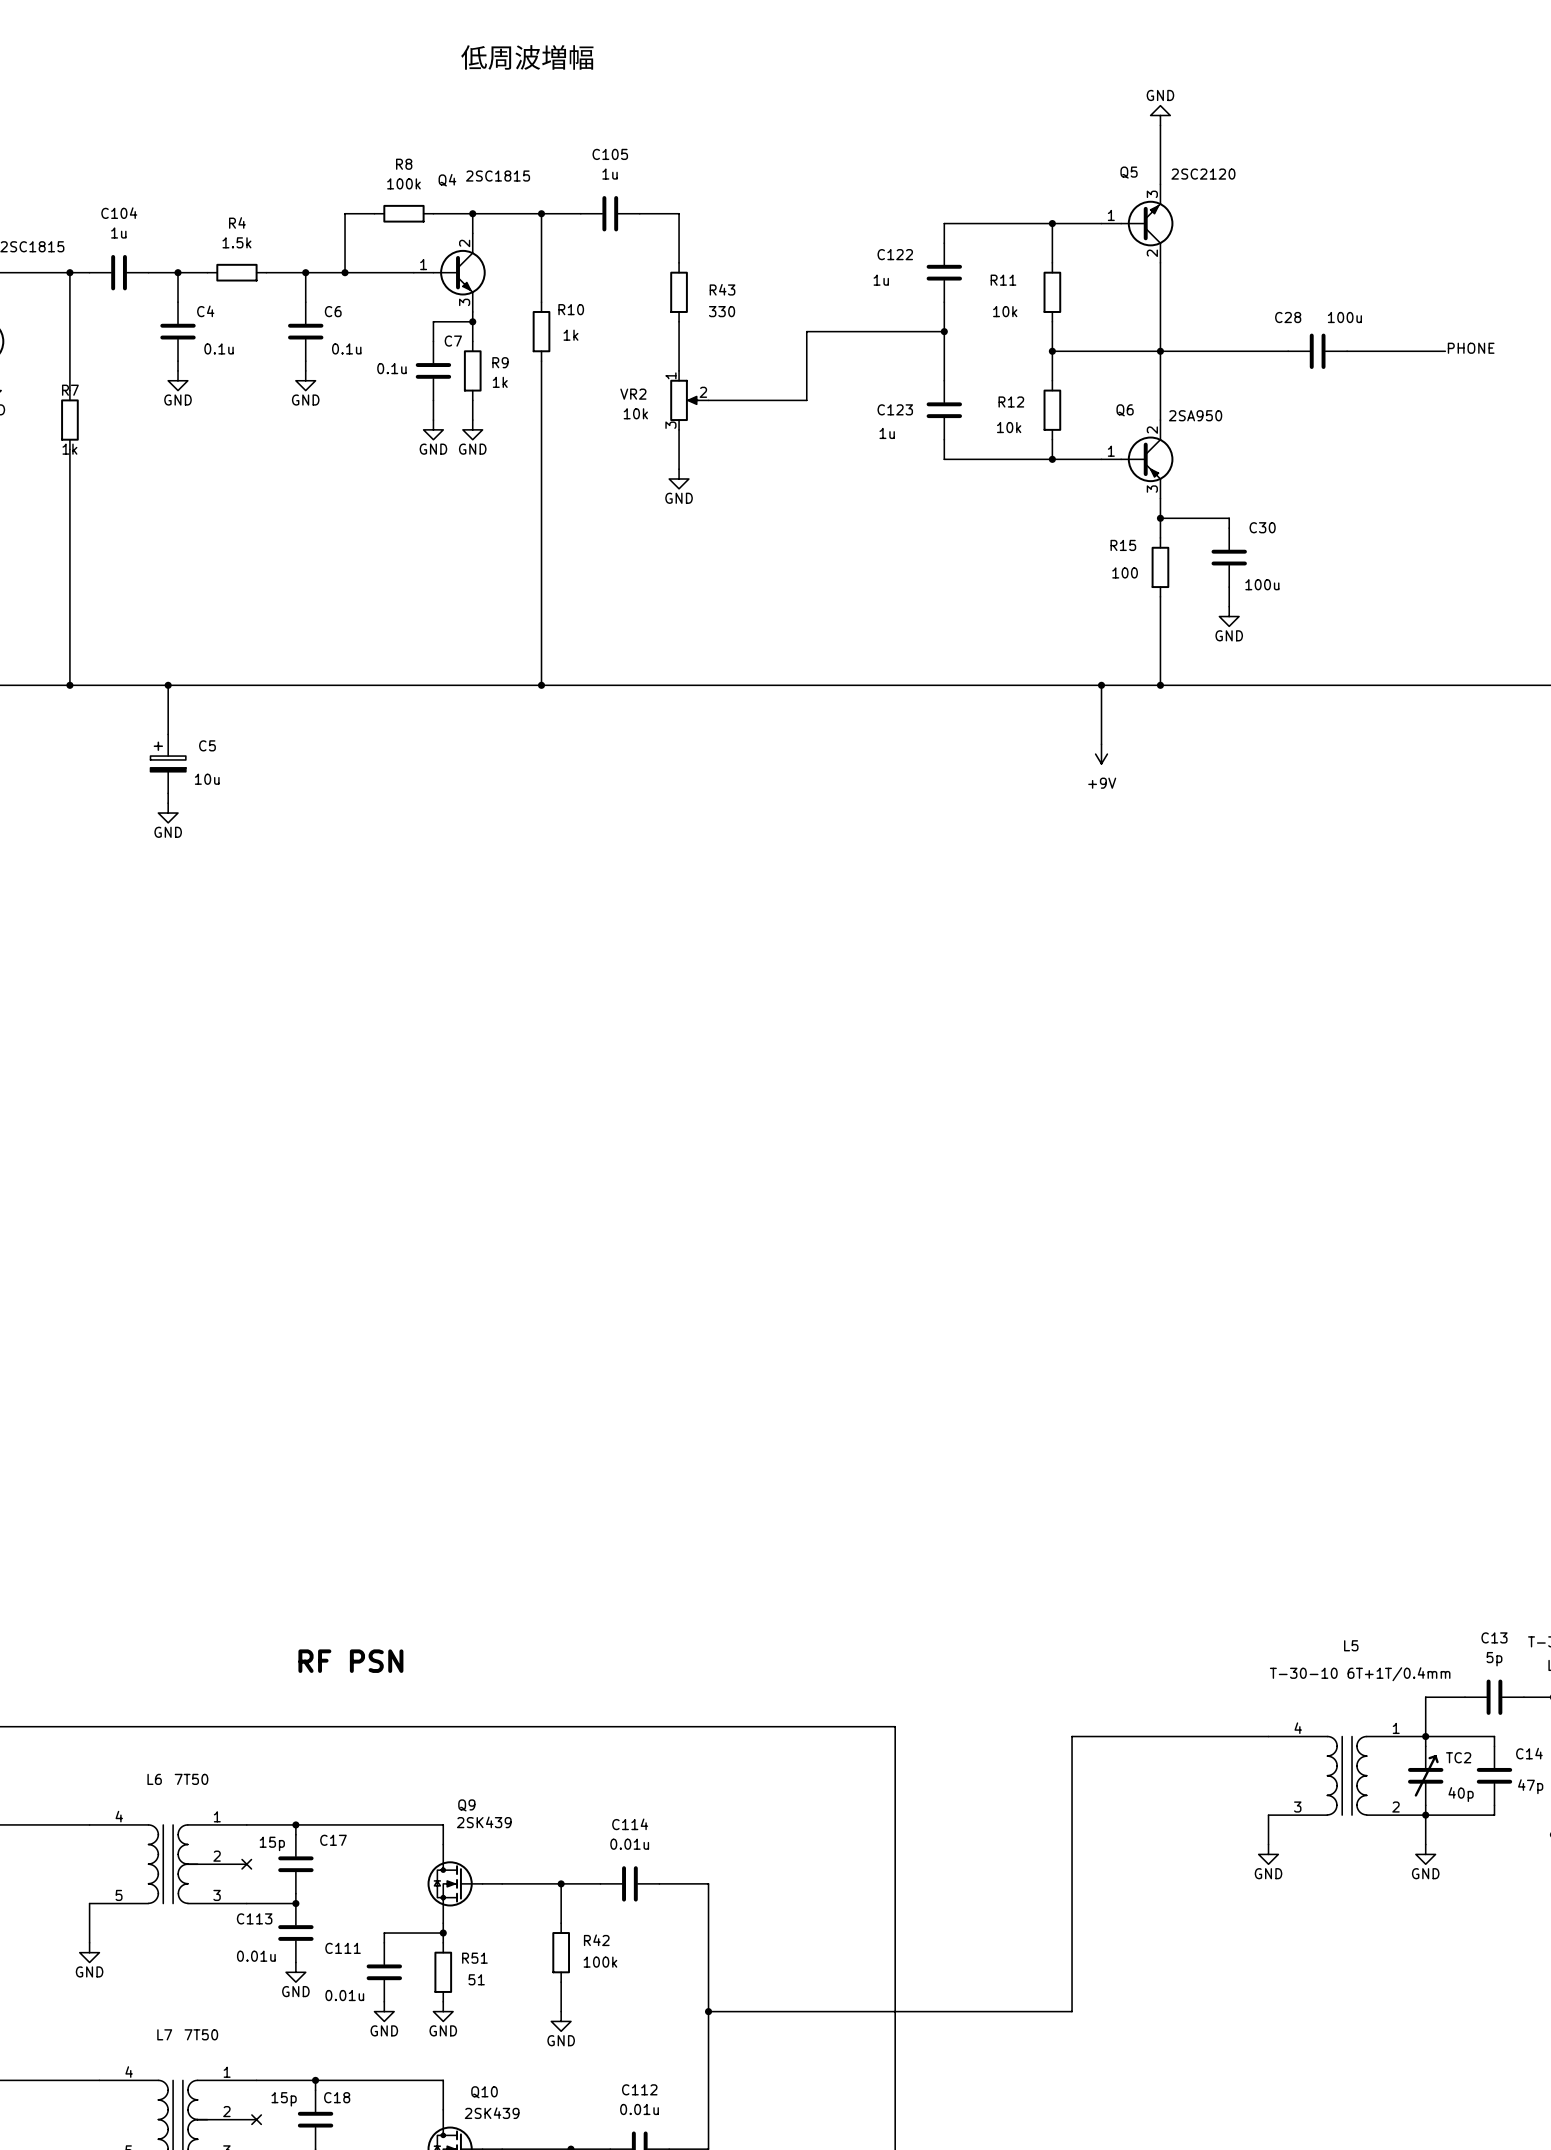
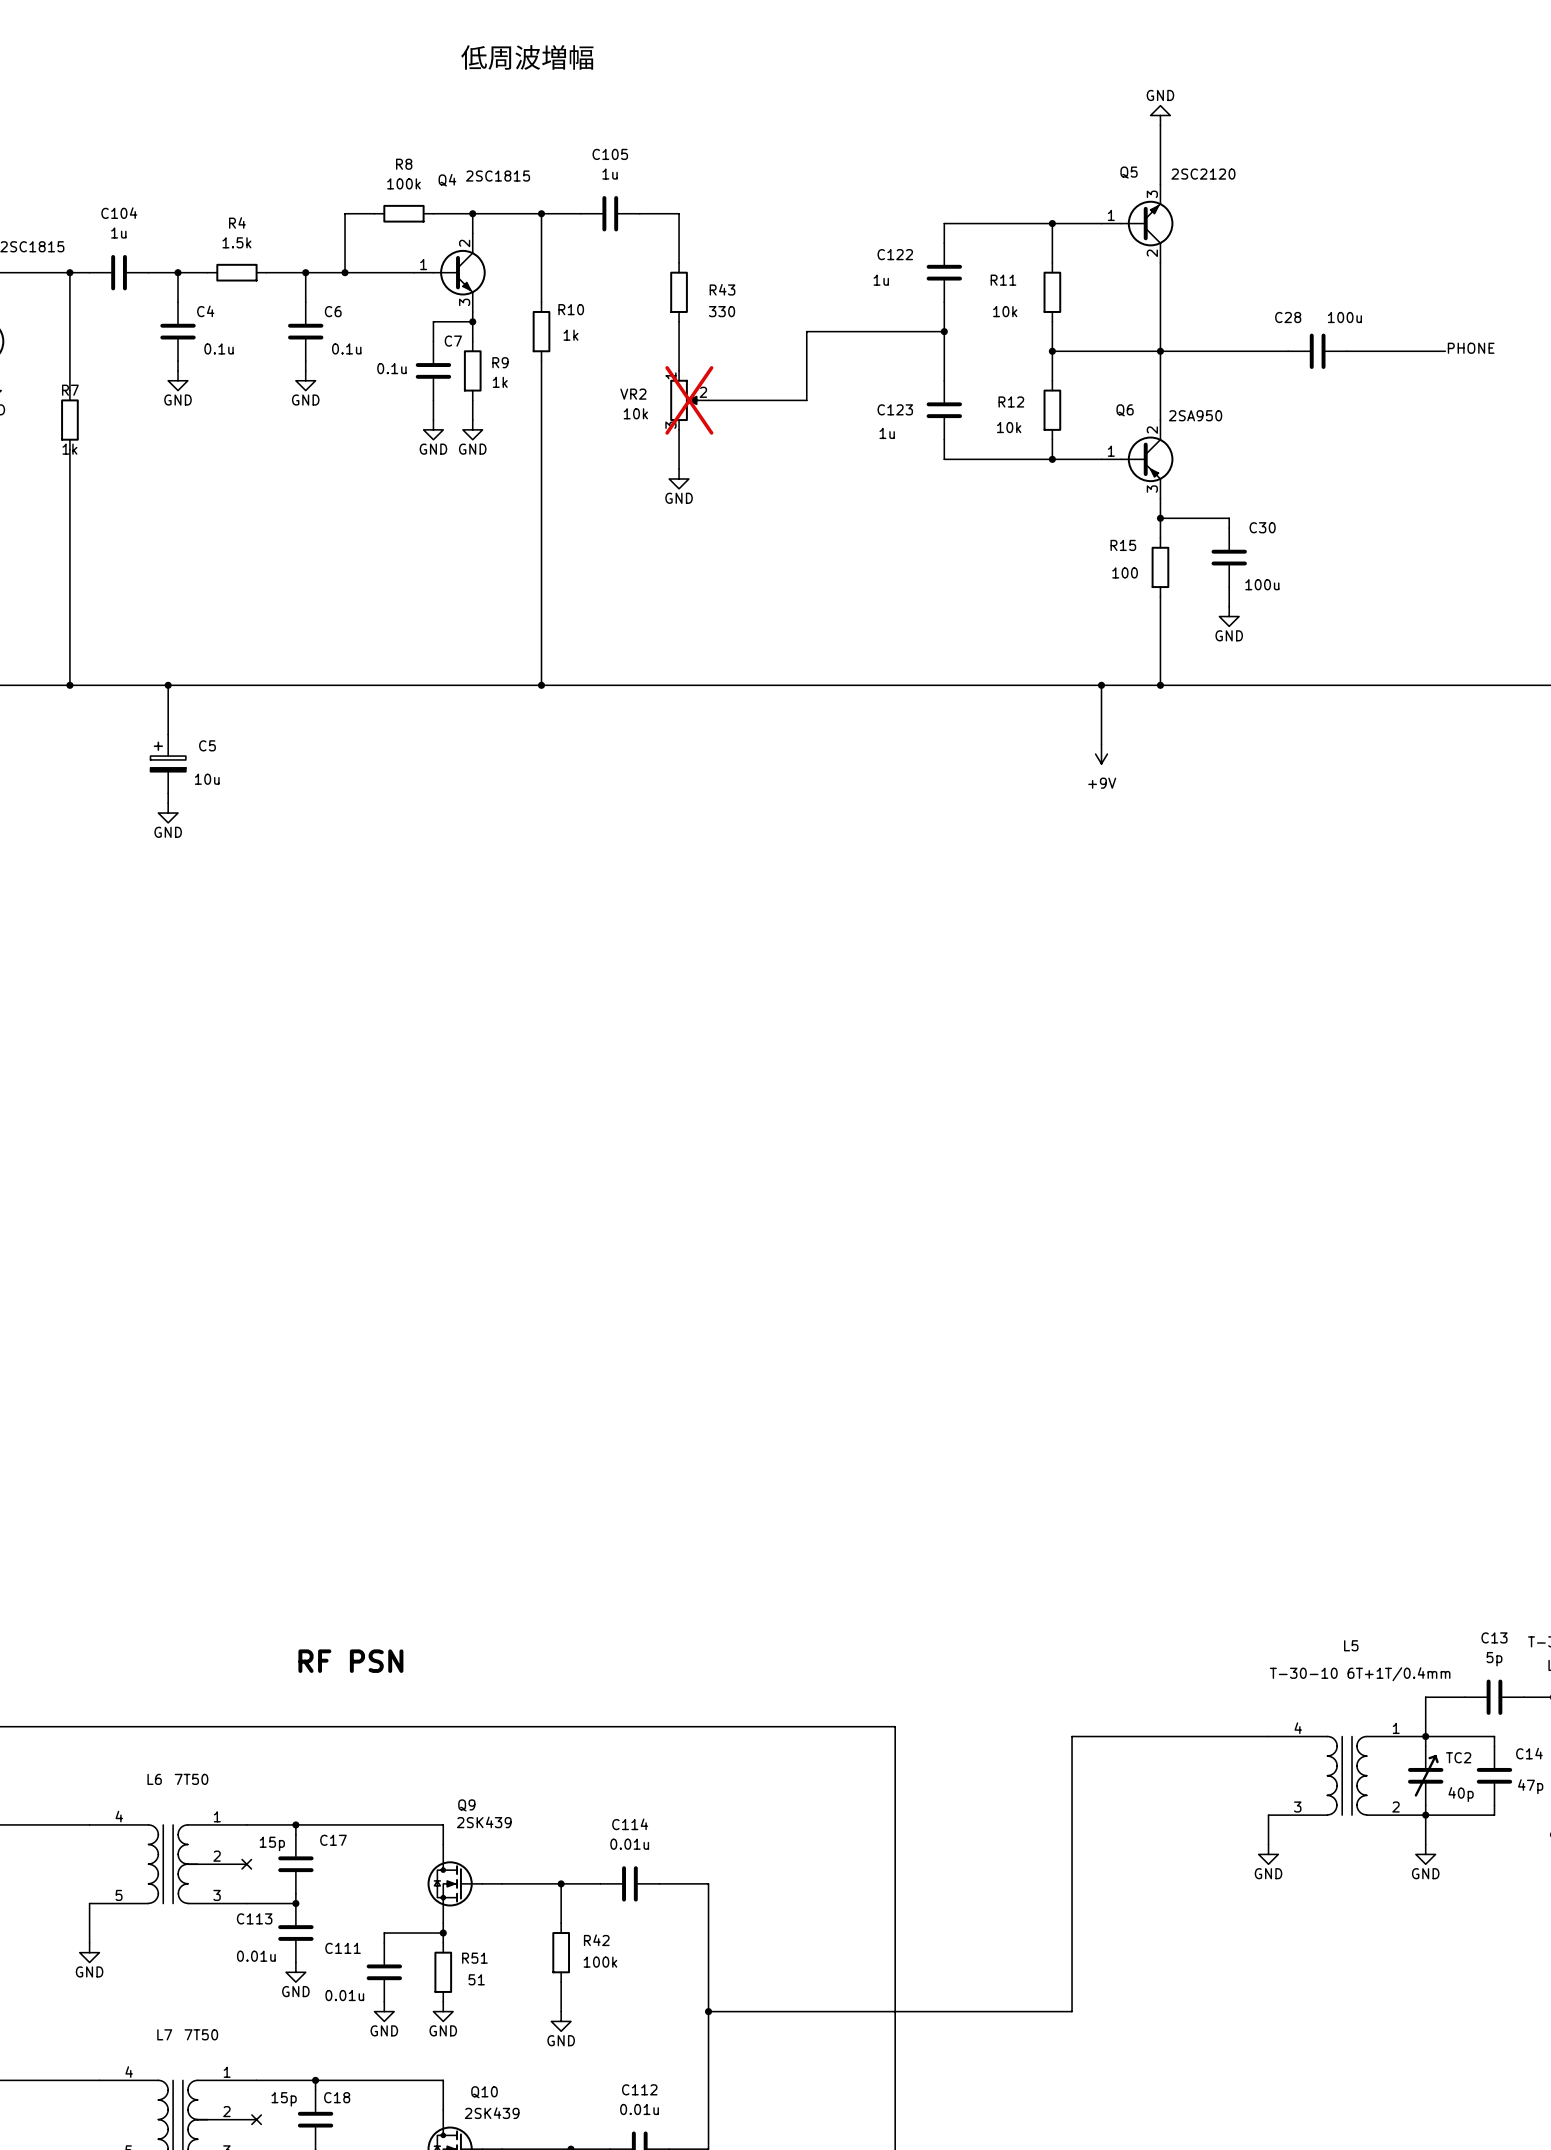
VR2 do-not-place cross: none -> (689, 400)

